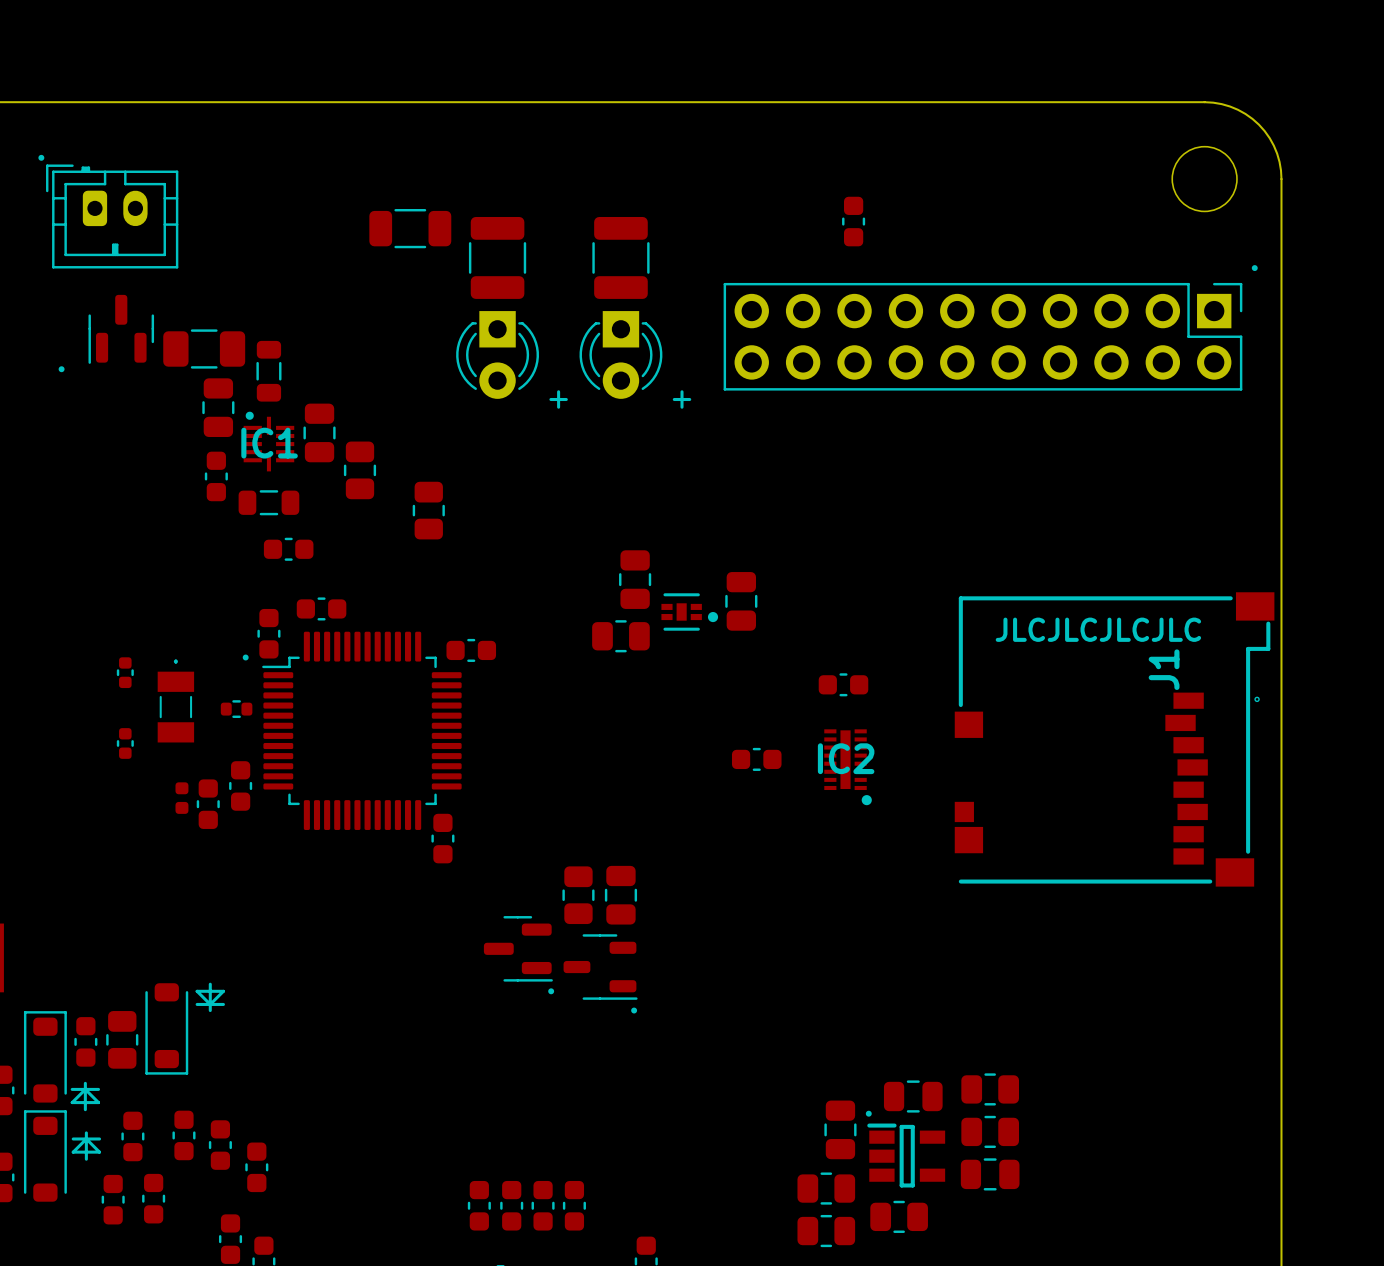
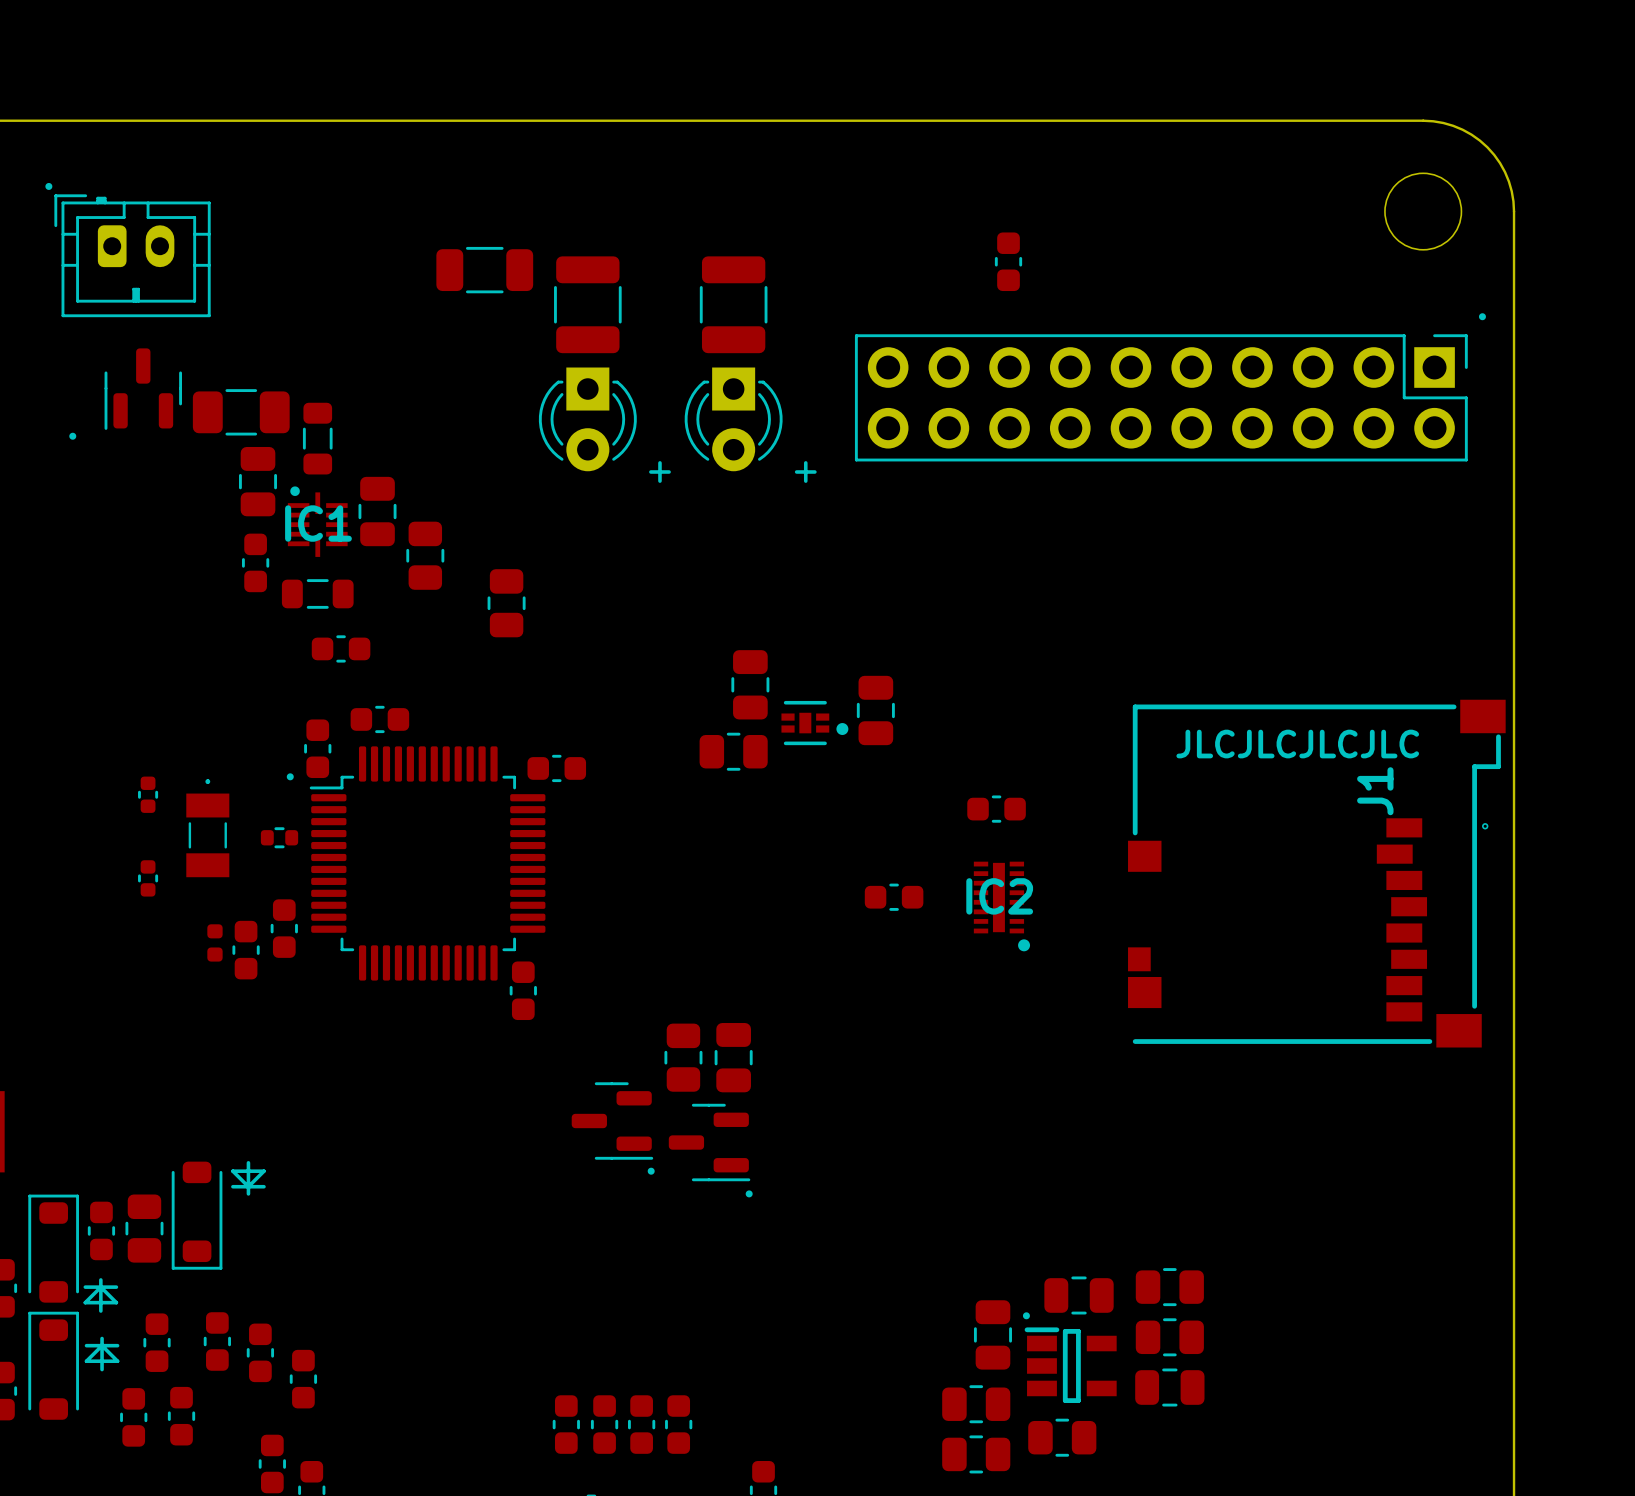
part footprint: [563, 934, 638, 1000] -> [668, 1103, 751, 1182]

